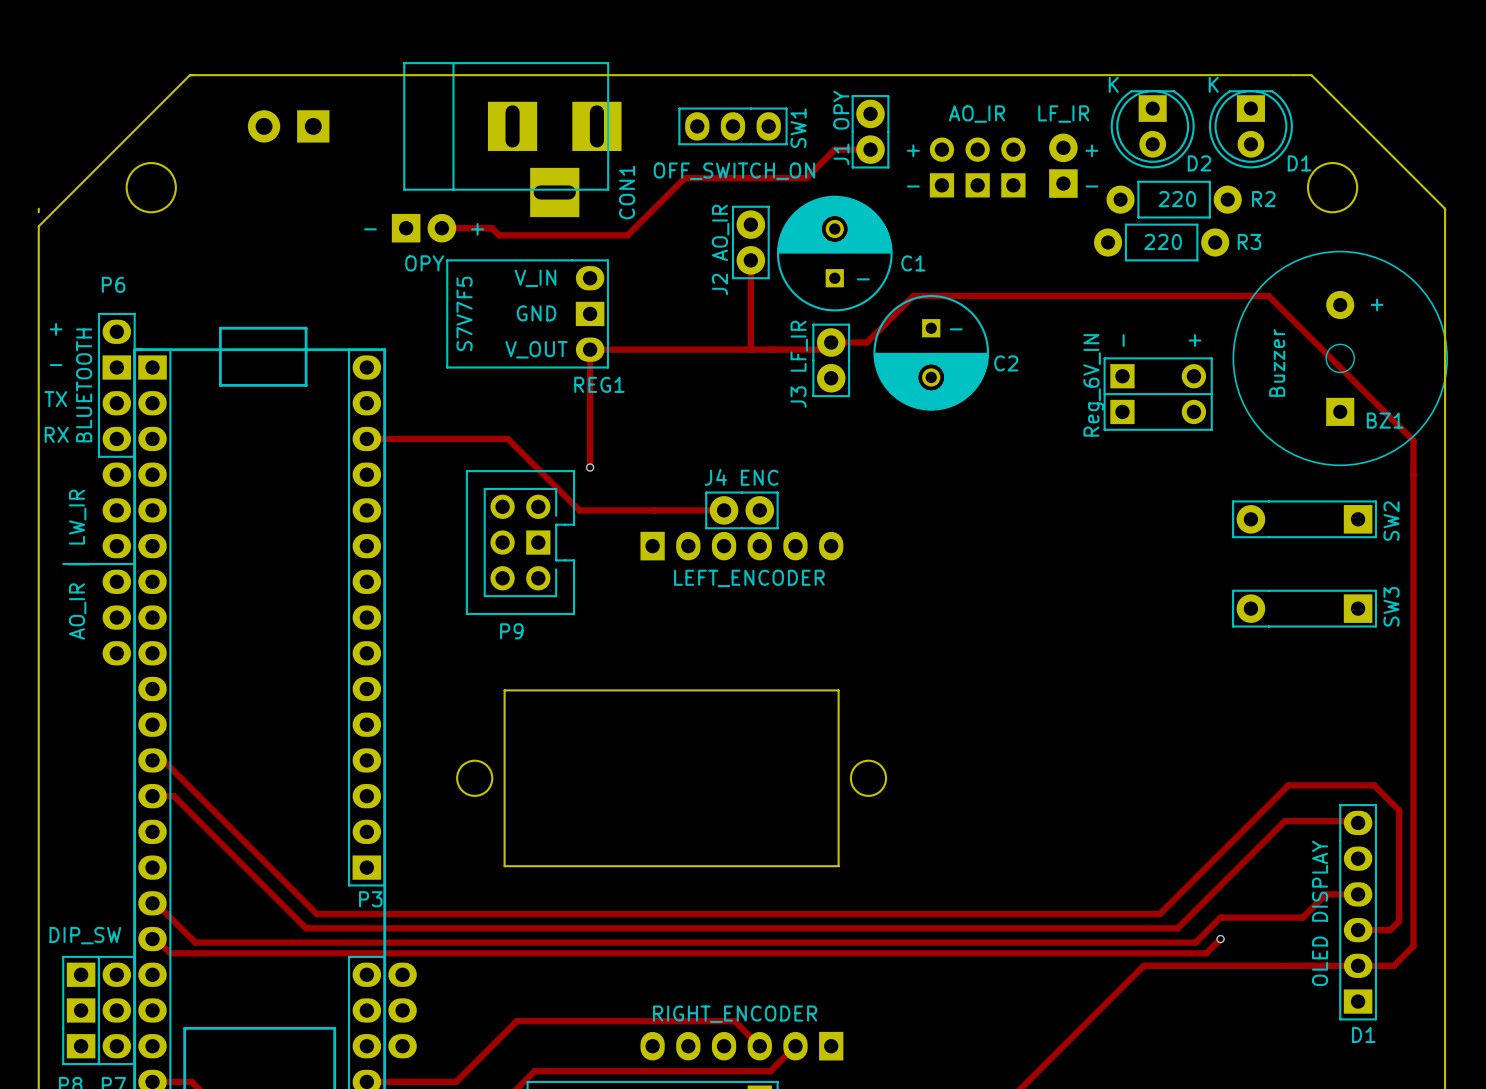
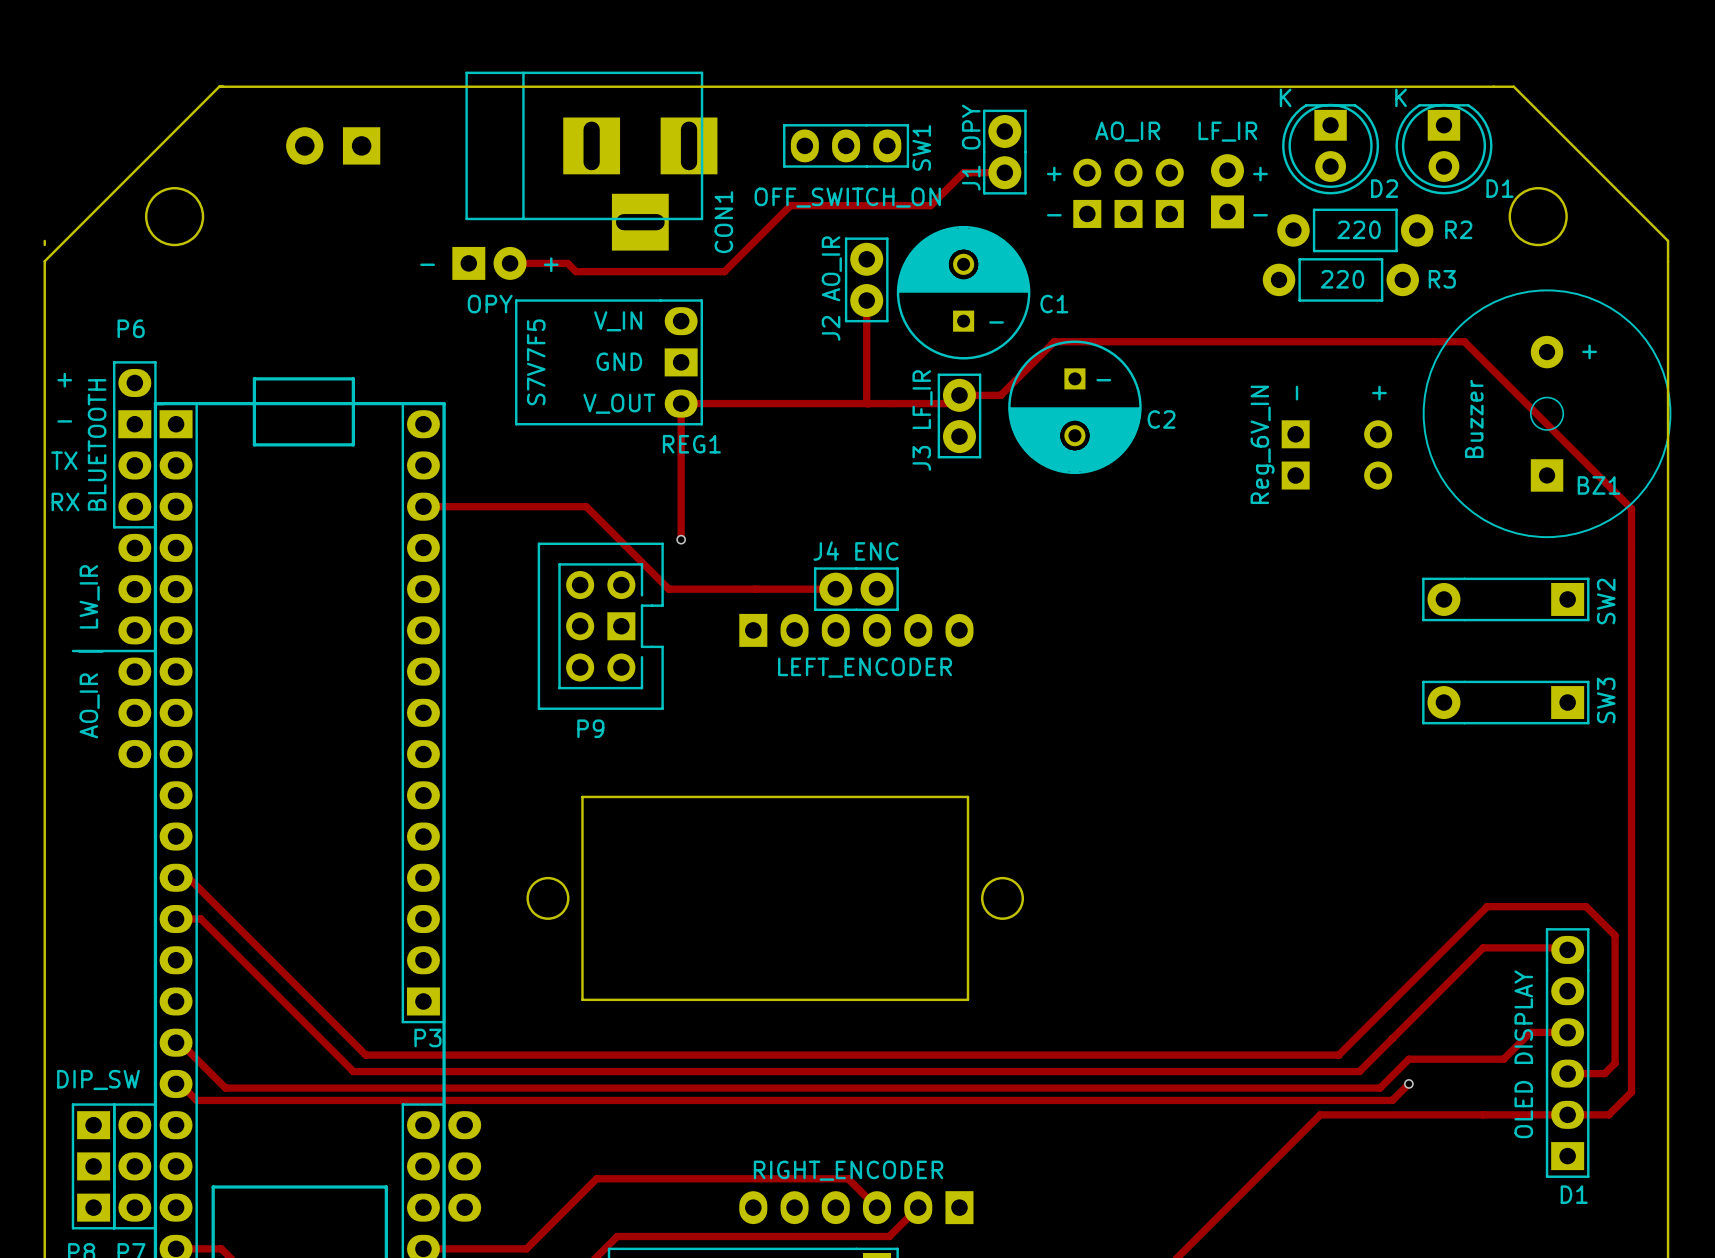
part footprint: [1103, 357, 1213, 431] -> [1281, 420, 1393, 490]

